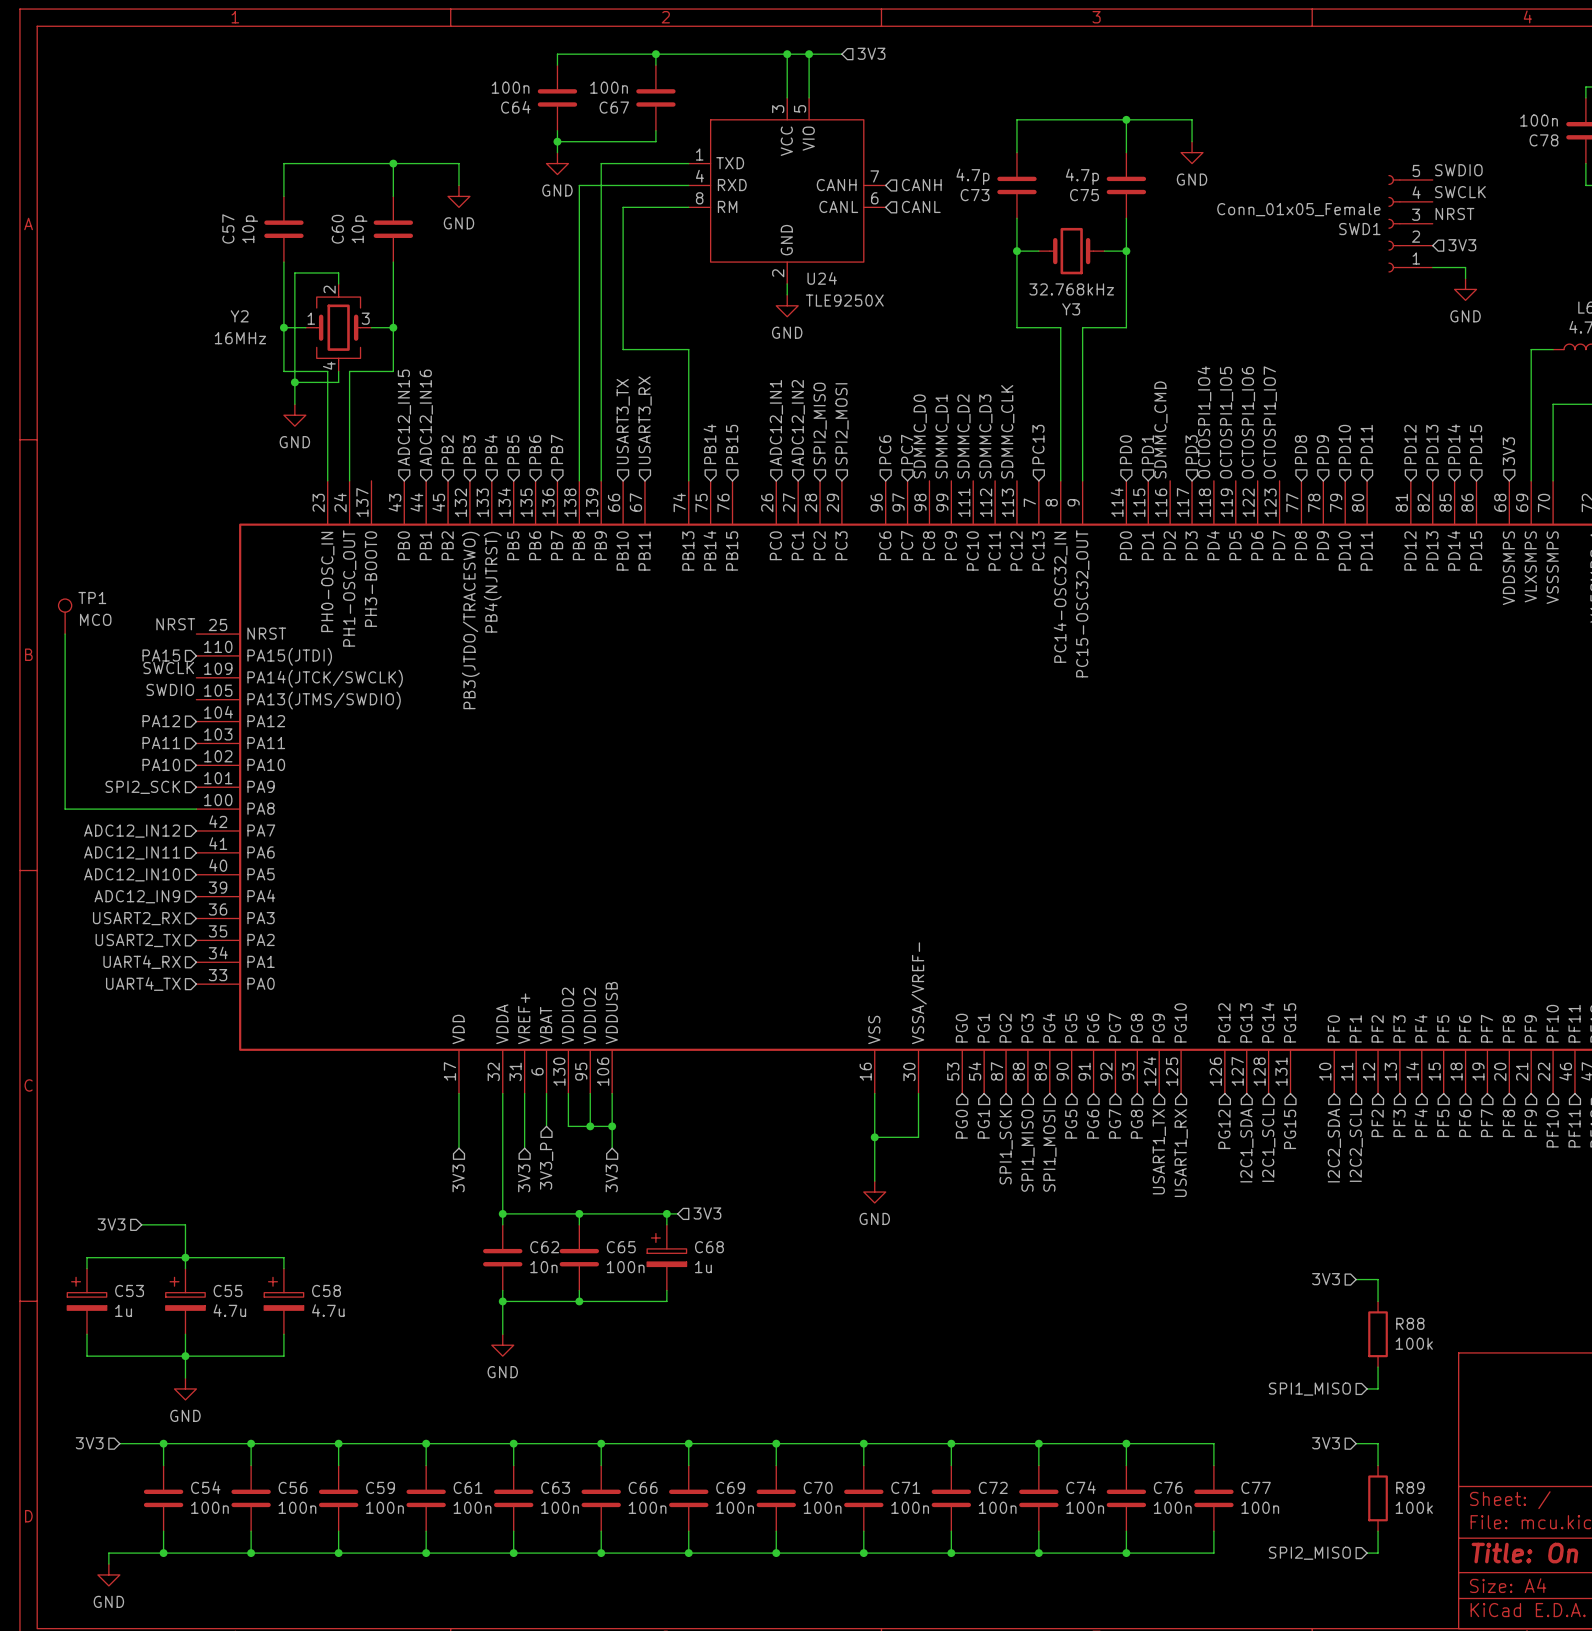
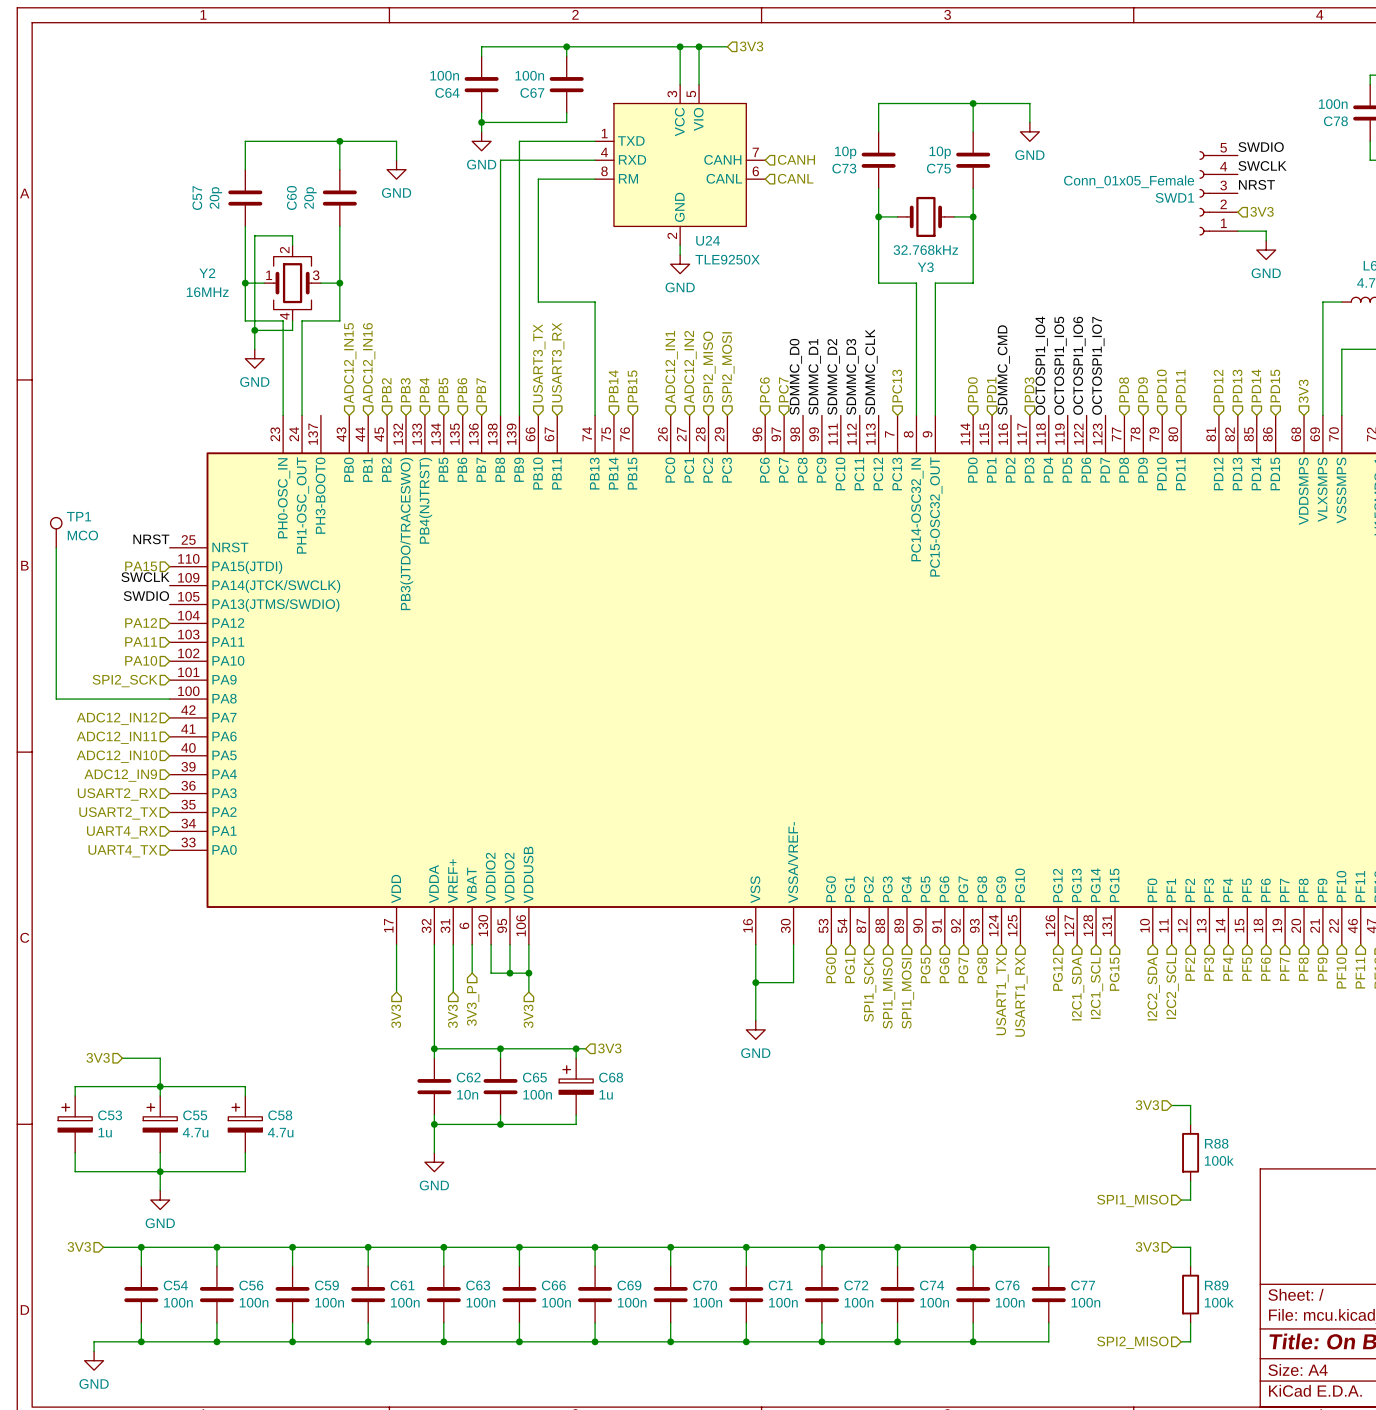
C73 value: 4.7p (972, 176) -> 10p (845, 152)
C75 value: 4.7p (1082, 176) -> 10p (940, 152)
C57 value: 10p (250, 229) -> 20p (215, 197)
C60 value: 10p (359, 229) -> 20p (310, 197)

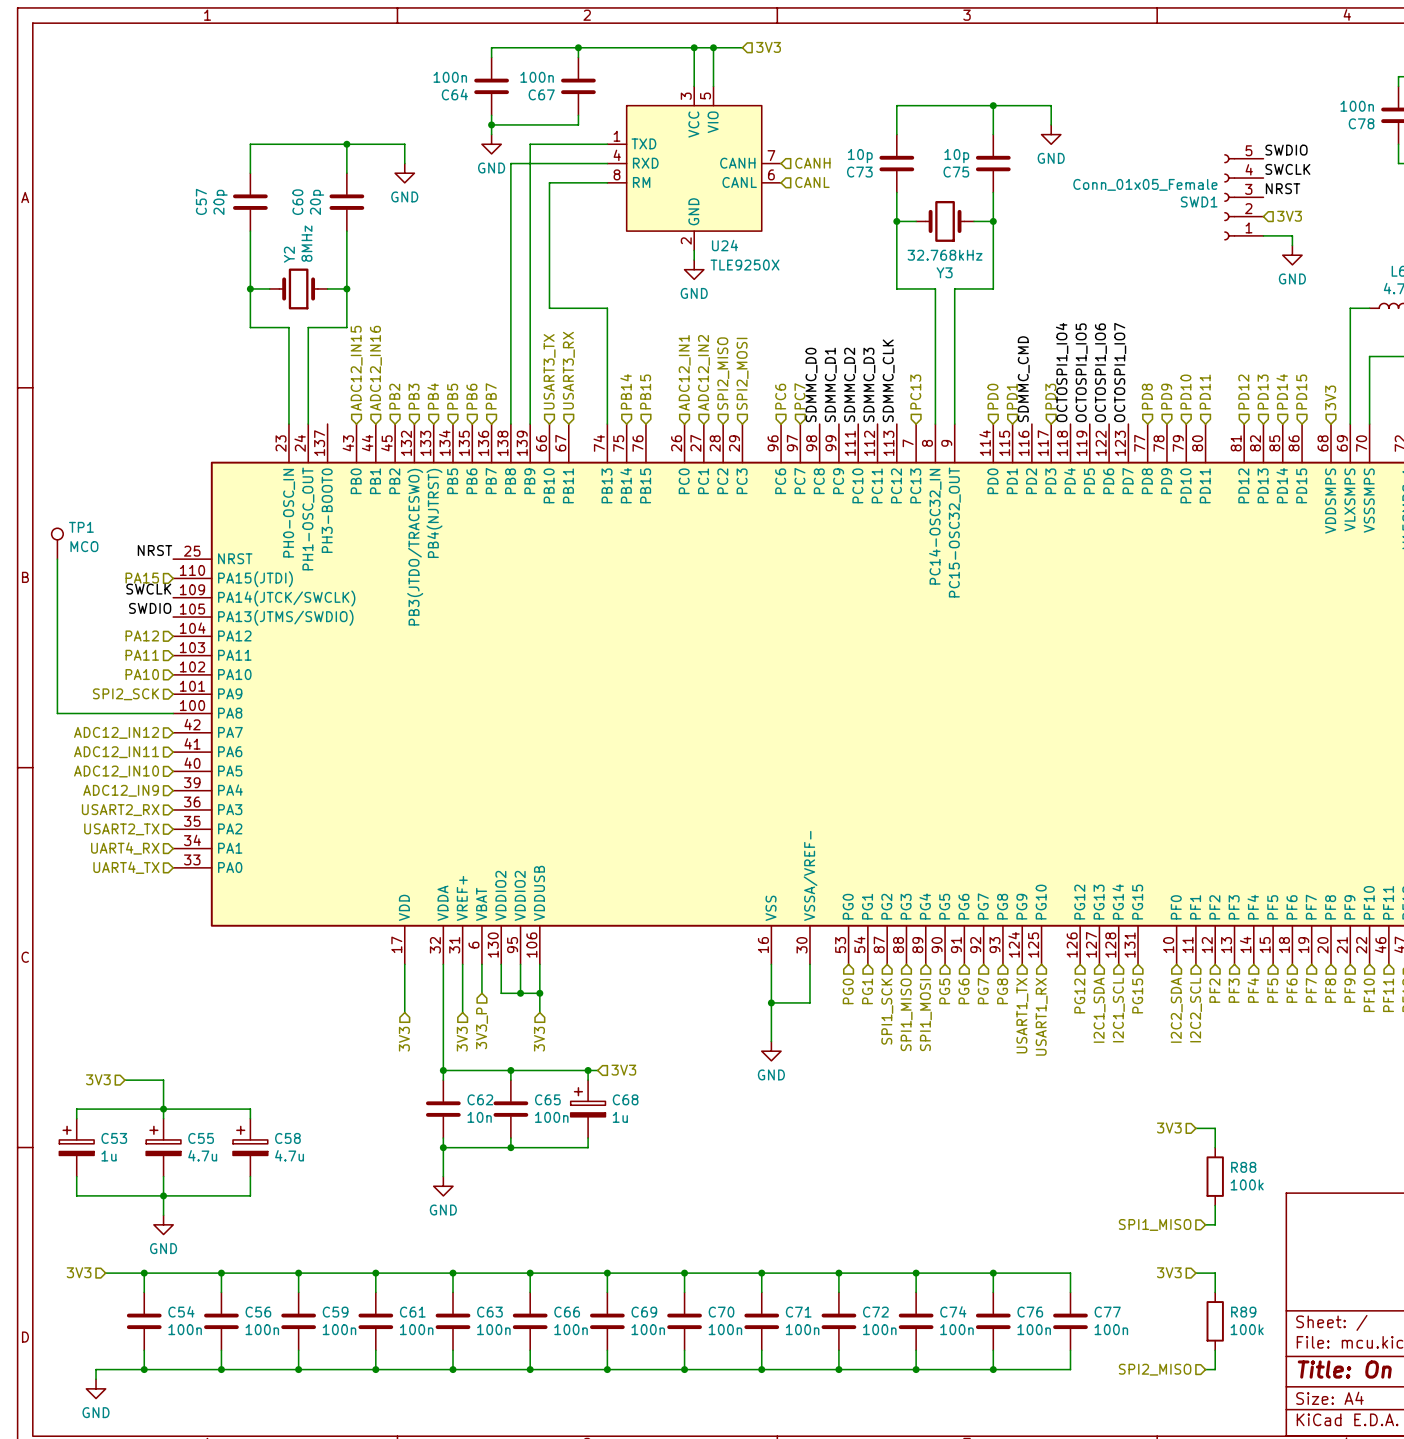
Y2 symbol: [264, 245, 321, 321] -> [269, 268, 328, 310]
wire: (292, 245) (292, 235) (254, 235) (254, 349) -> none
Y2 name position: Y2 (207, 273) -> Y2 (289, 254)
Y2 value: 16MHz (207, 292) -> 8MHz (306, 243)
wire: (292, 320) (292, 330) (254, 330) -> none
junction: (254, 330) -> none
power symbol: GND (254, 358) -> none

